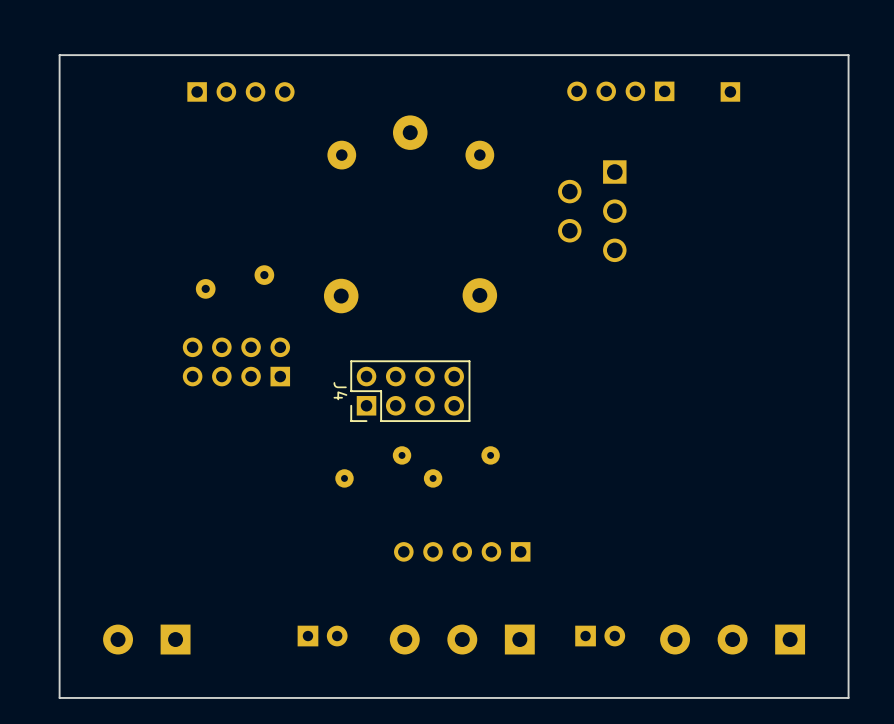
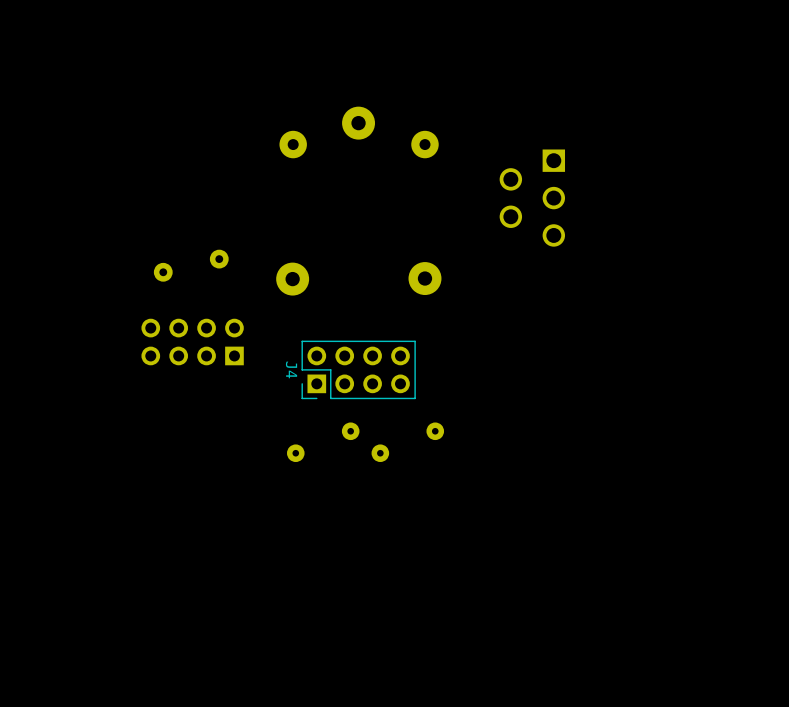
board edge: (848, 55) (59, 55) (59, 697) (848, 697) (848, 55) -> none
part: (240, 91) -> none
part: (620, 91) -> none
part: (730, 91) -> none
part: (462, 551) -> none
part: (322, 636) -> none
part: (600, 636) -> none
part: (146, 639) -> none
part: (462, 639) -> none
part: (732, 639) -> none

